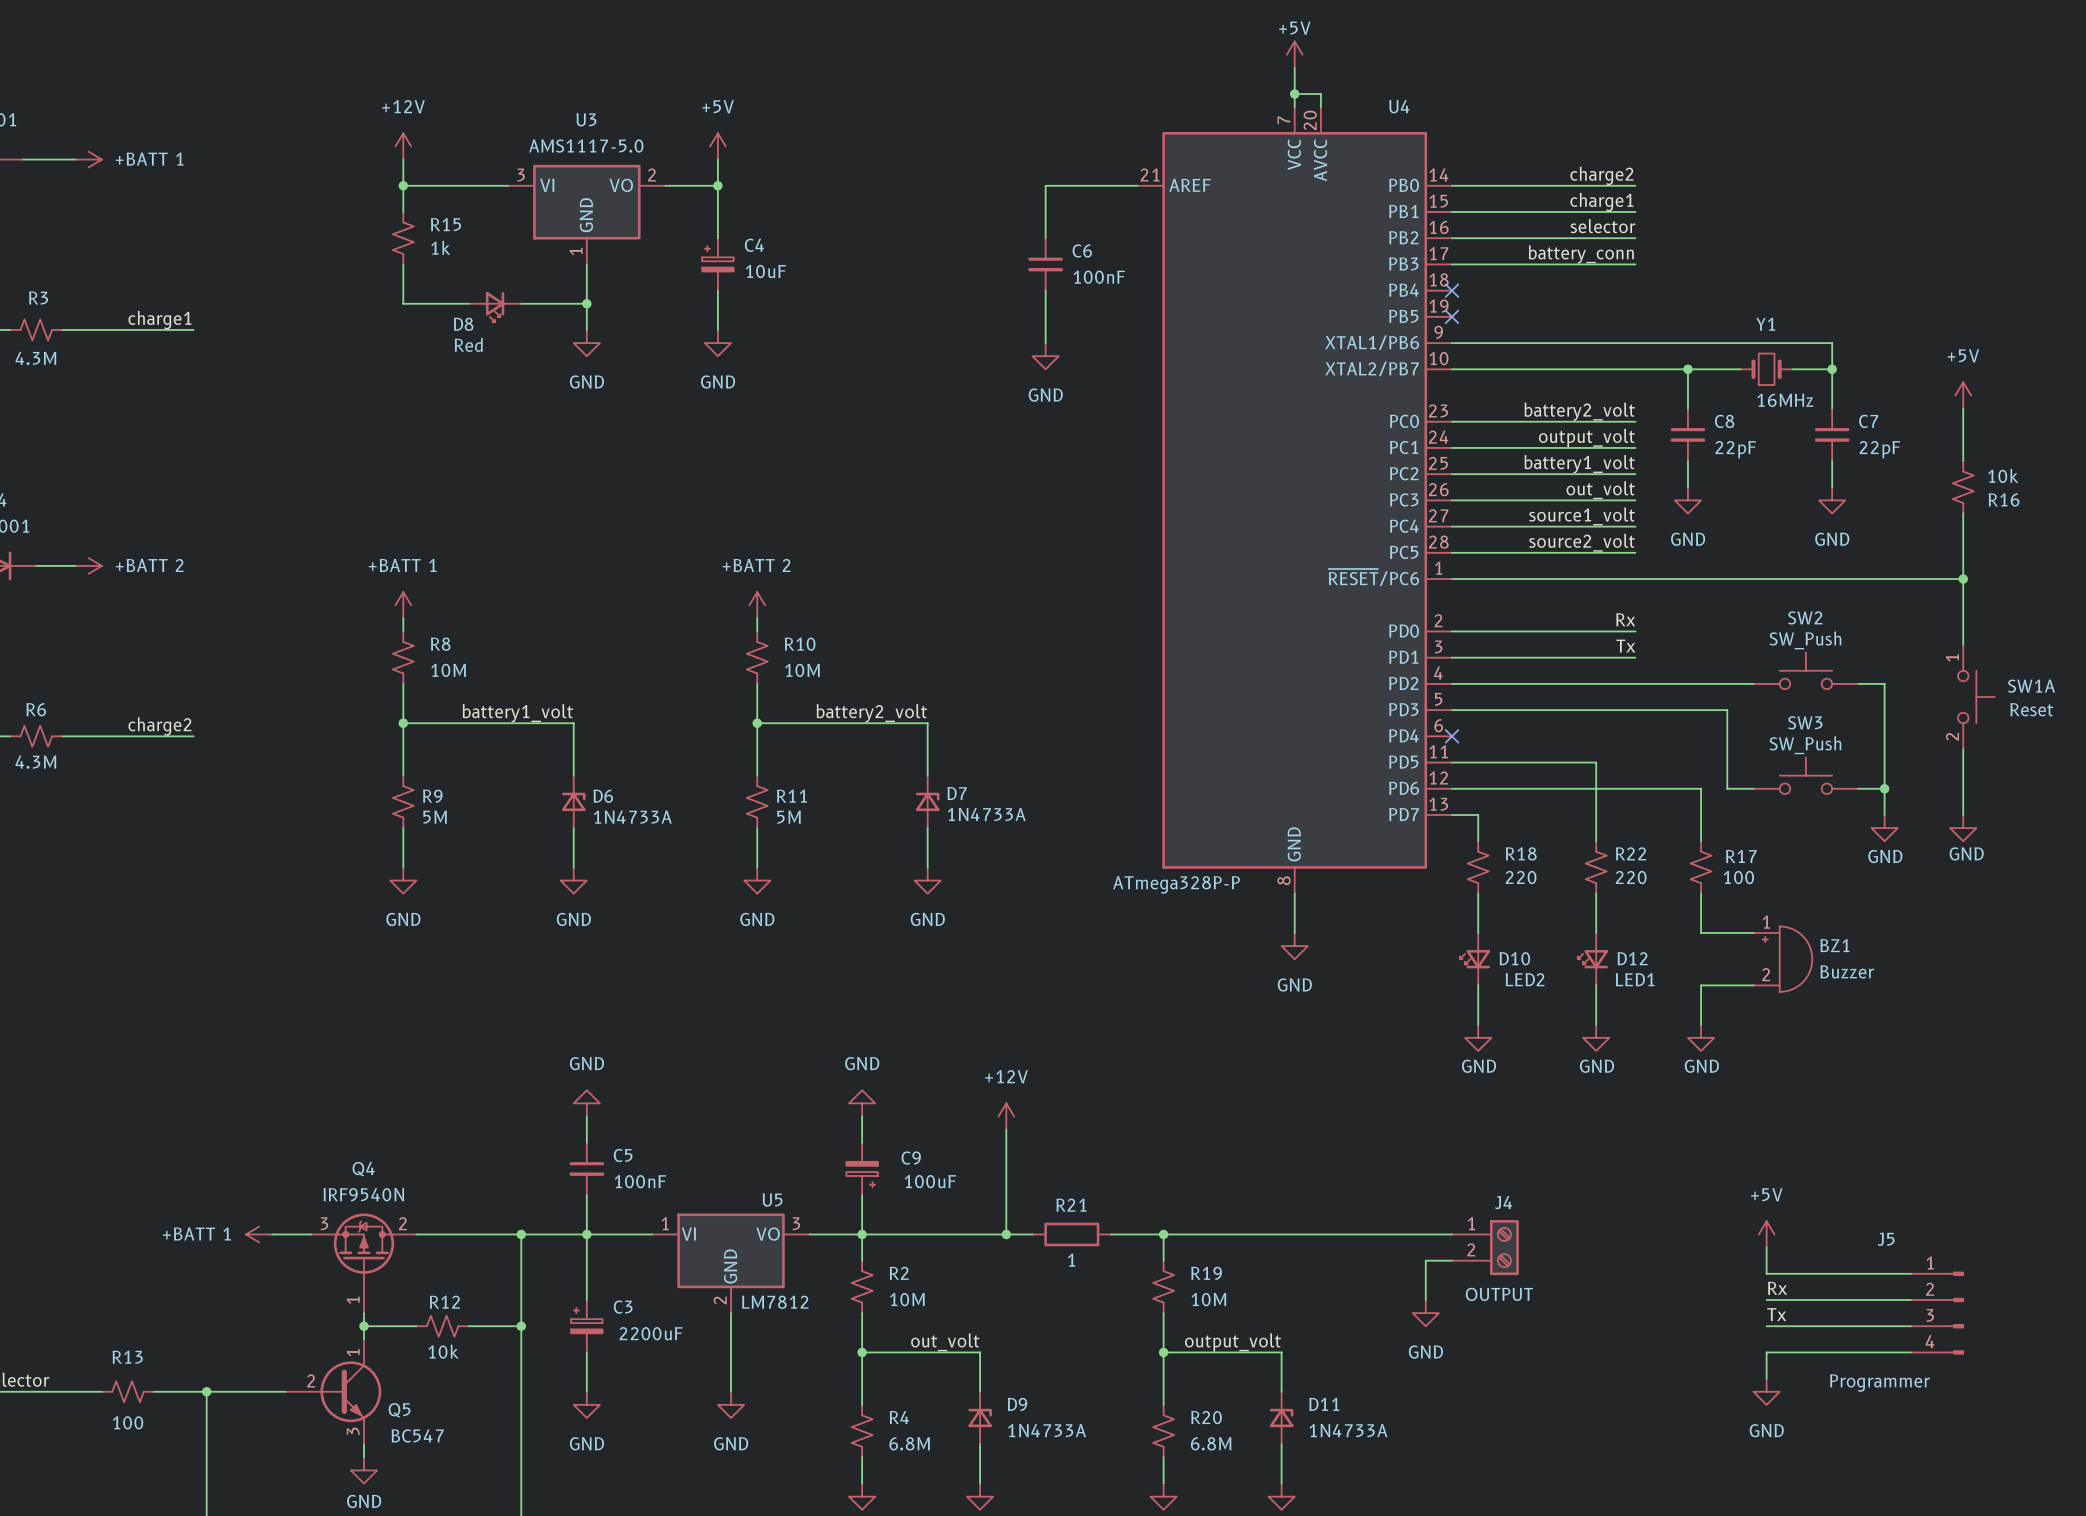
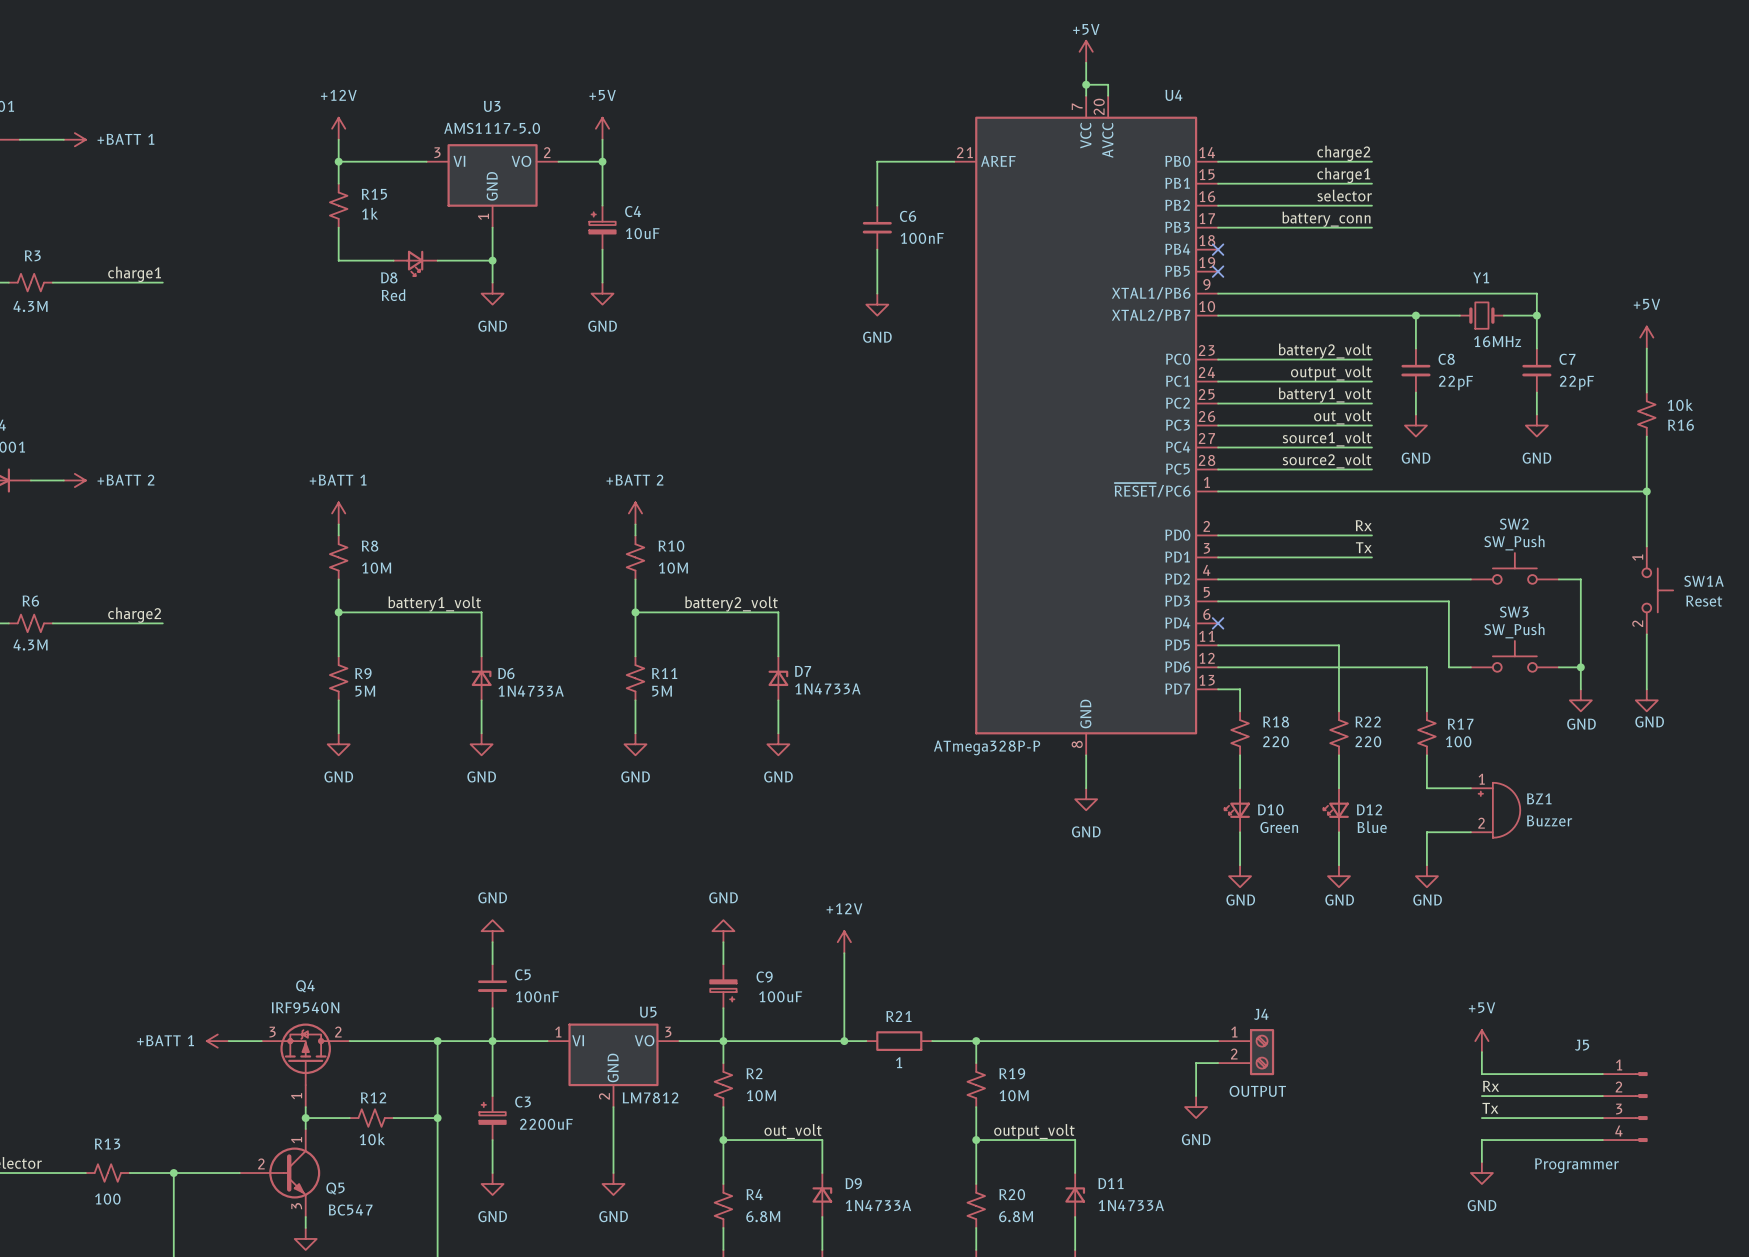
D10 value: LED2 (1525, 979) -> Green (1279, 827)
D12 value: LED1 (1635, 979) -> Blue (1372, 827)

